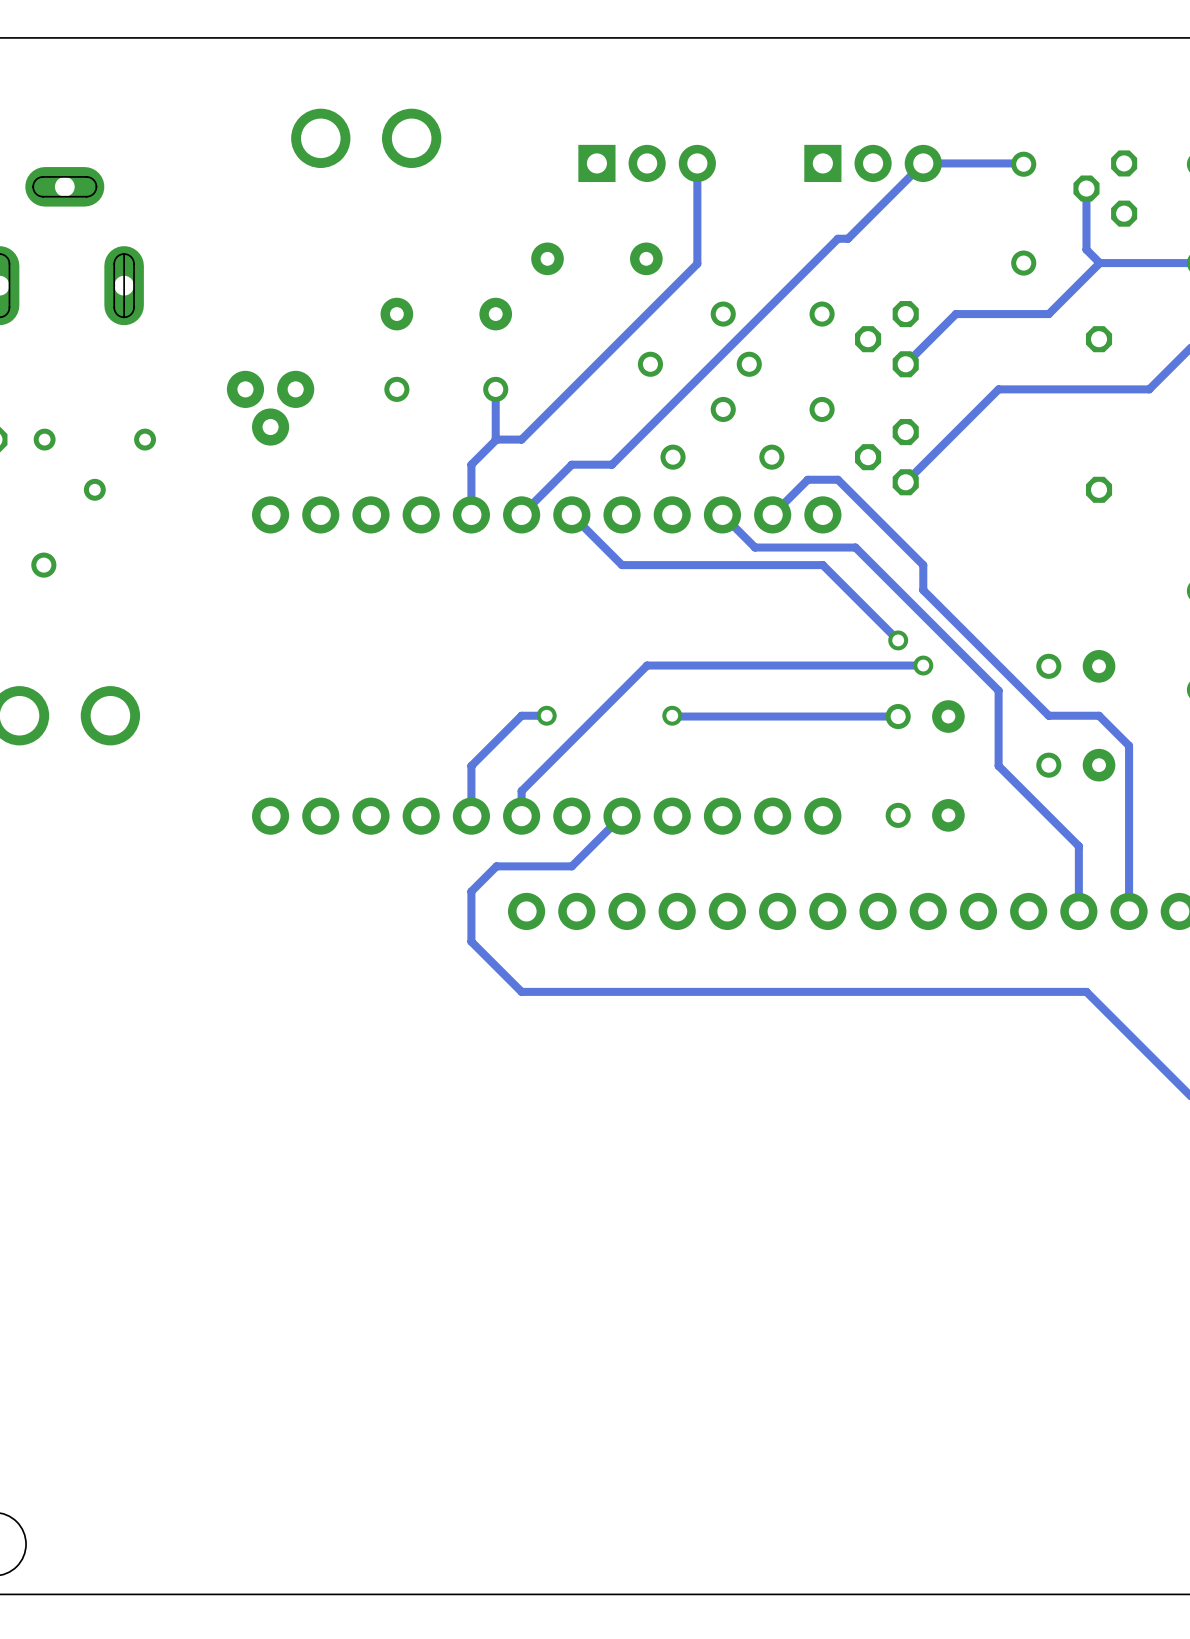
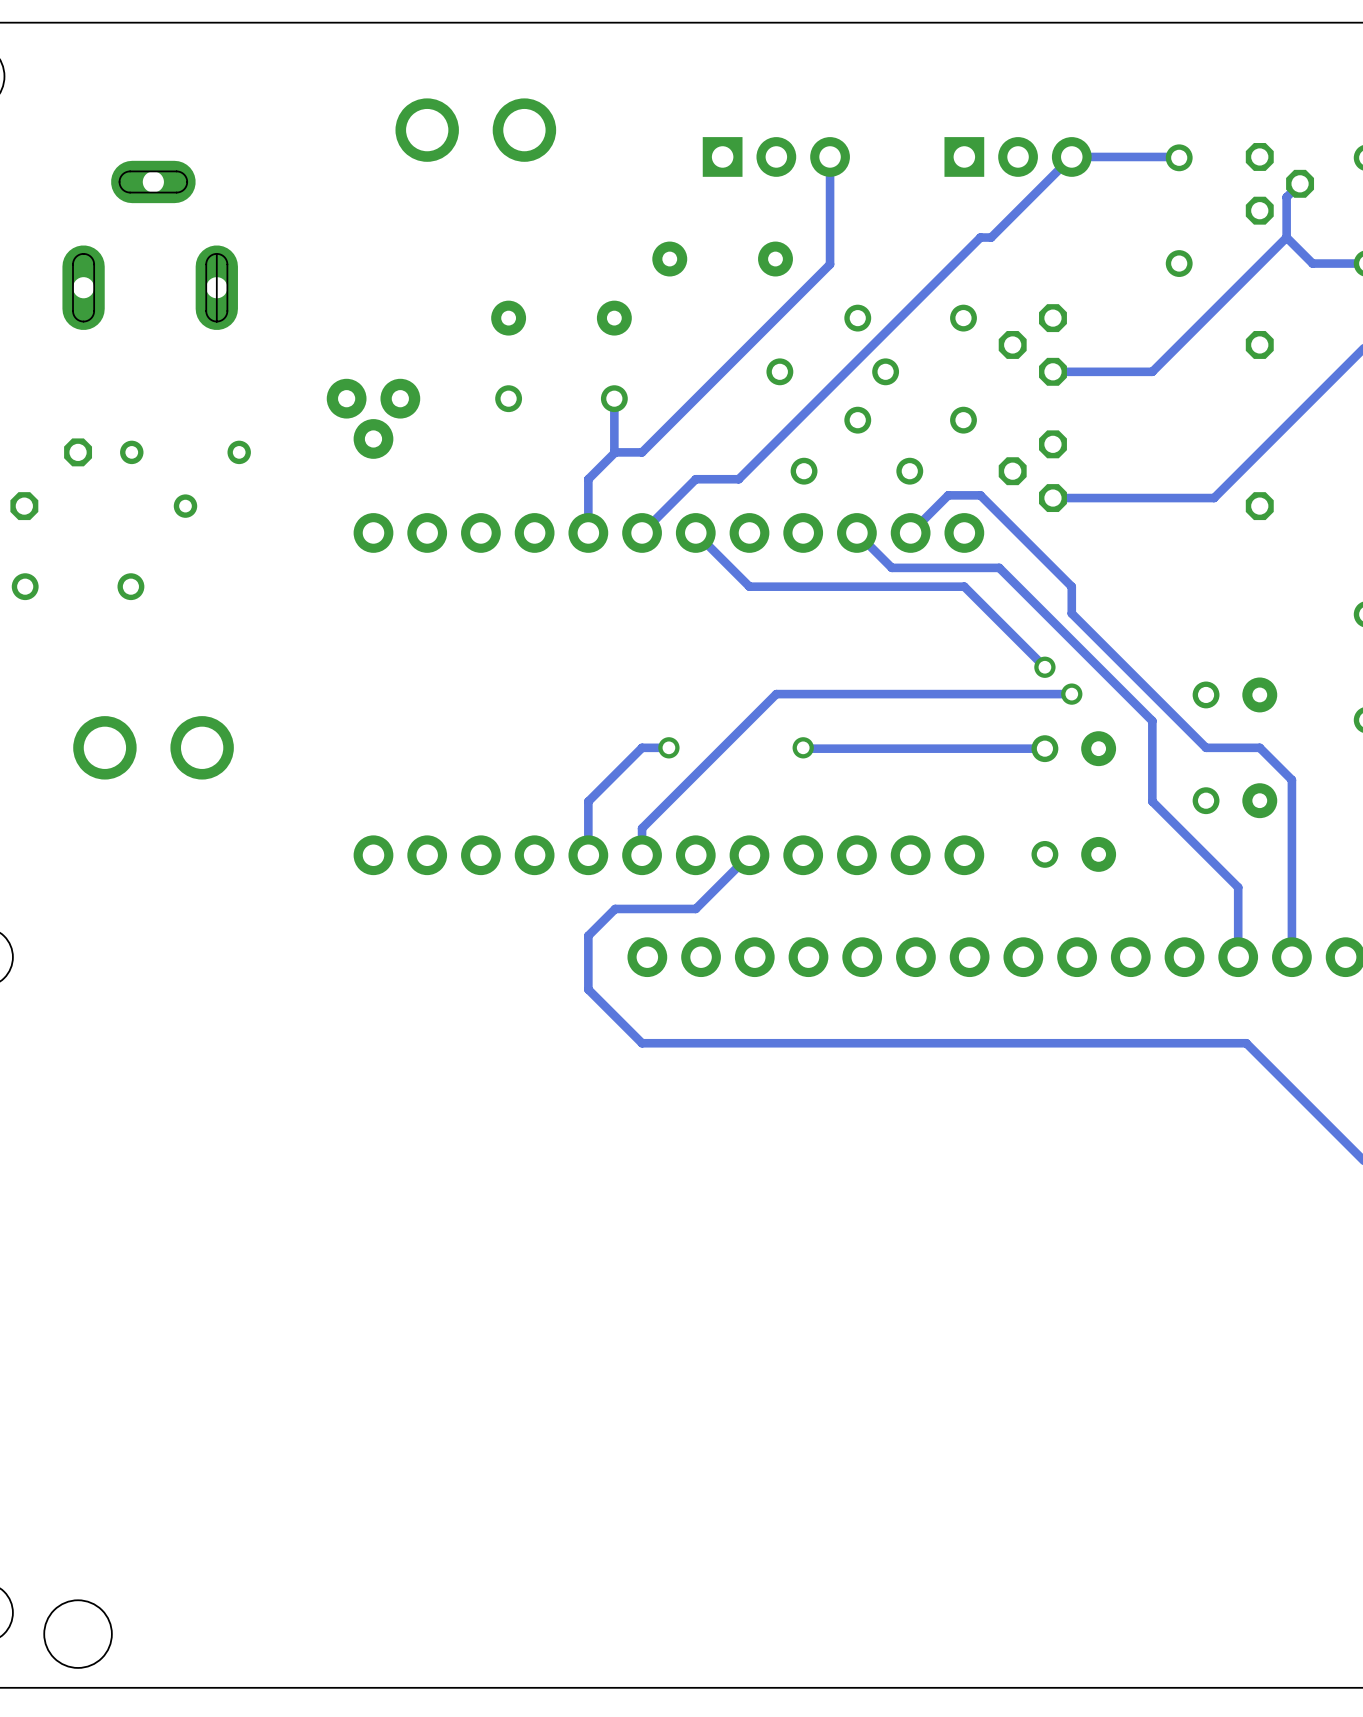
track: (1086, 188) (1086, 249) (1099, 263) (1148, 263) -> (1286, 237) (1312, 263)
part rotation: 0° (1105, 188) -> 180° (1279, 183)
track: none -> (1300, 183) (1286, 197) (1286, 237)
track: none -> (1286, 237) (1260, 263)
track: (1048, 314) (955, 314) (905, 364) -> (1206, 318) (1152, 371) (1052, 371)
track: (1149, 389) (998, 389) (905, 482) -> (1313, 398) (1214, 498) (1052, 498)

